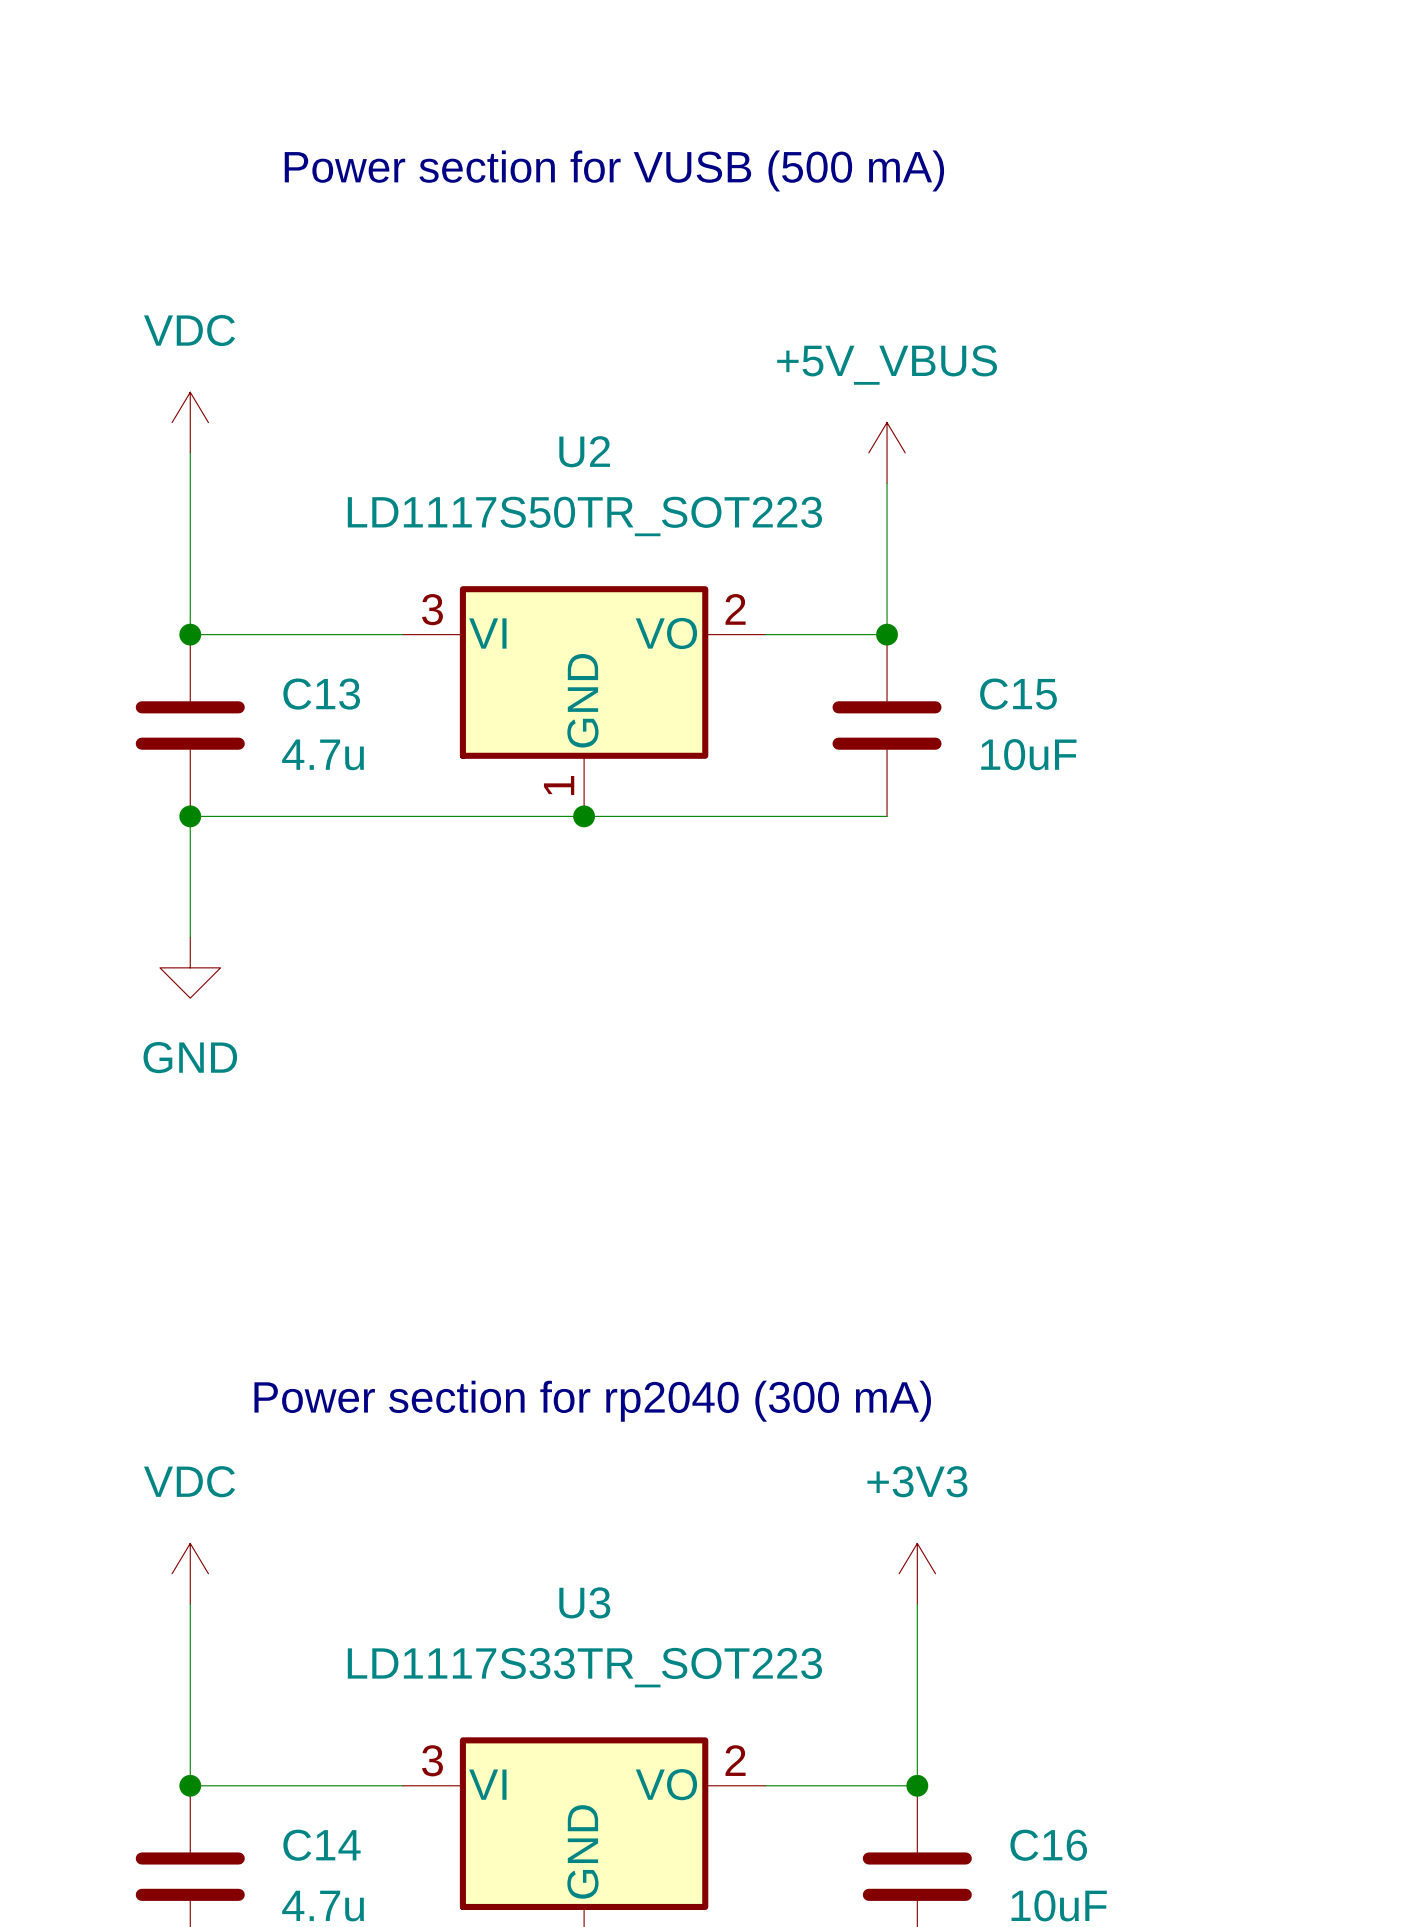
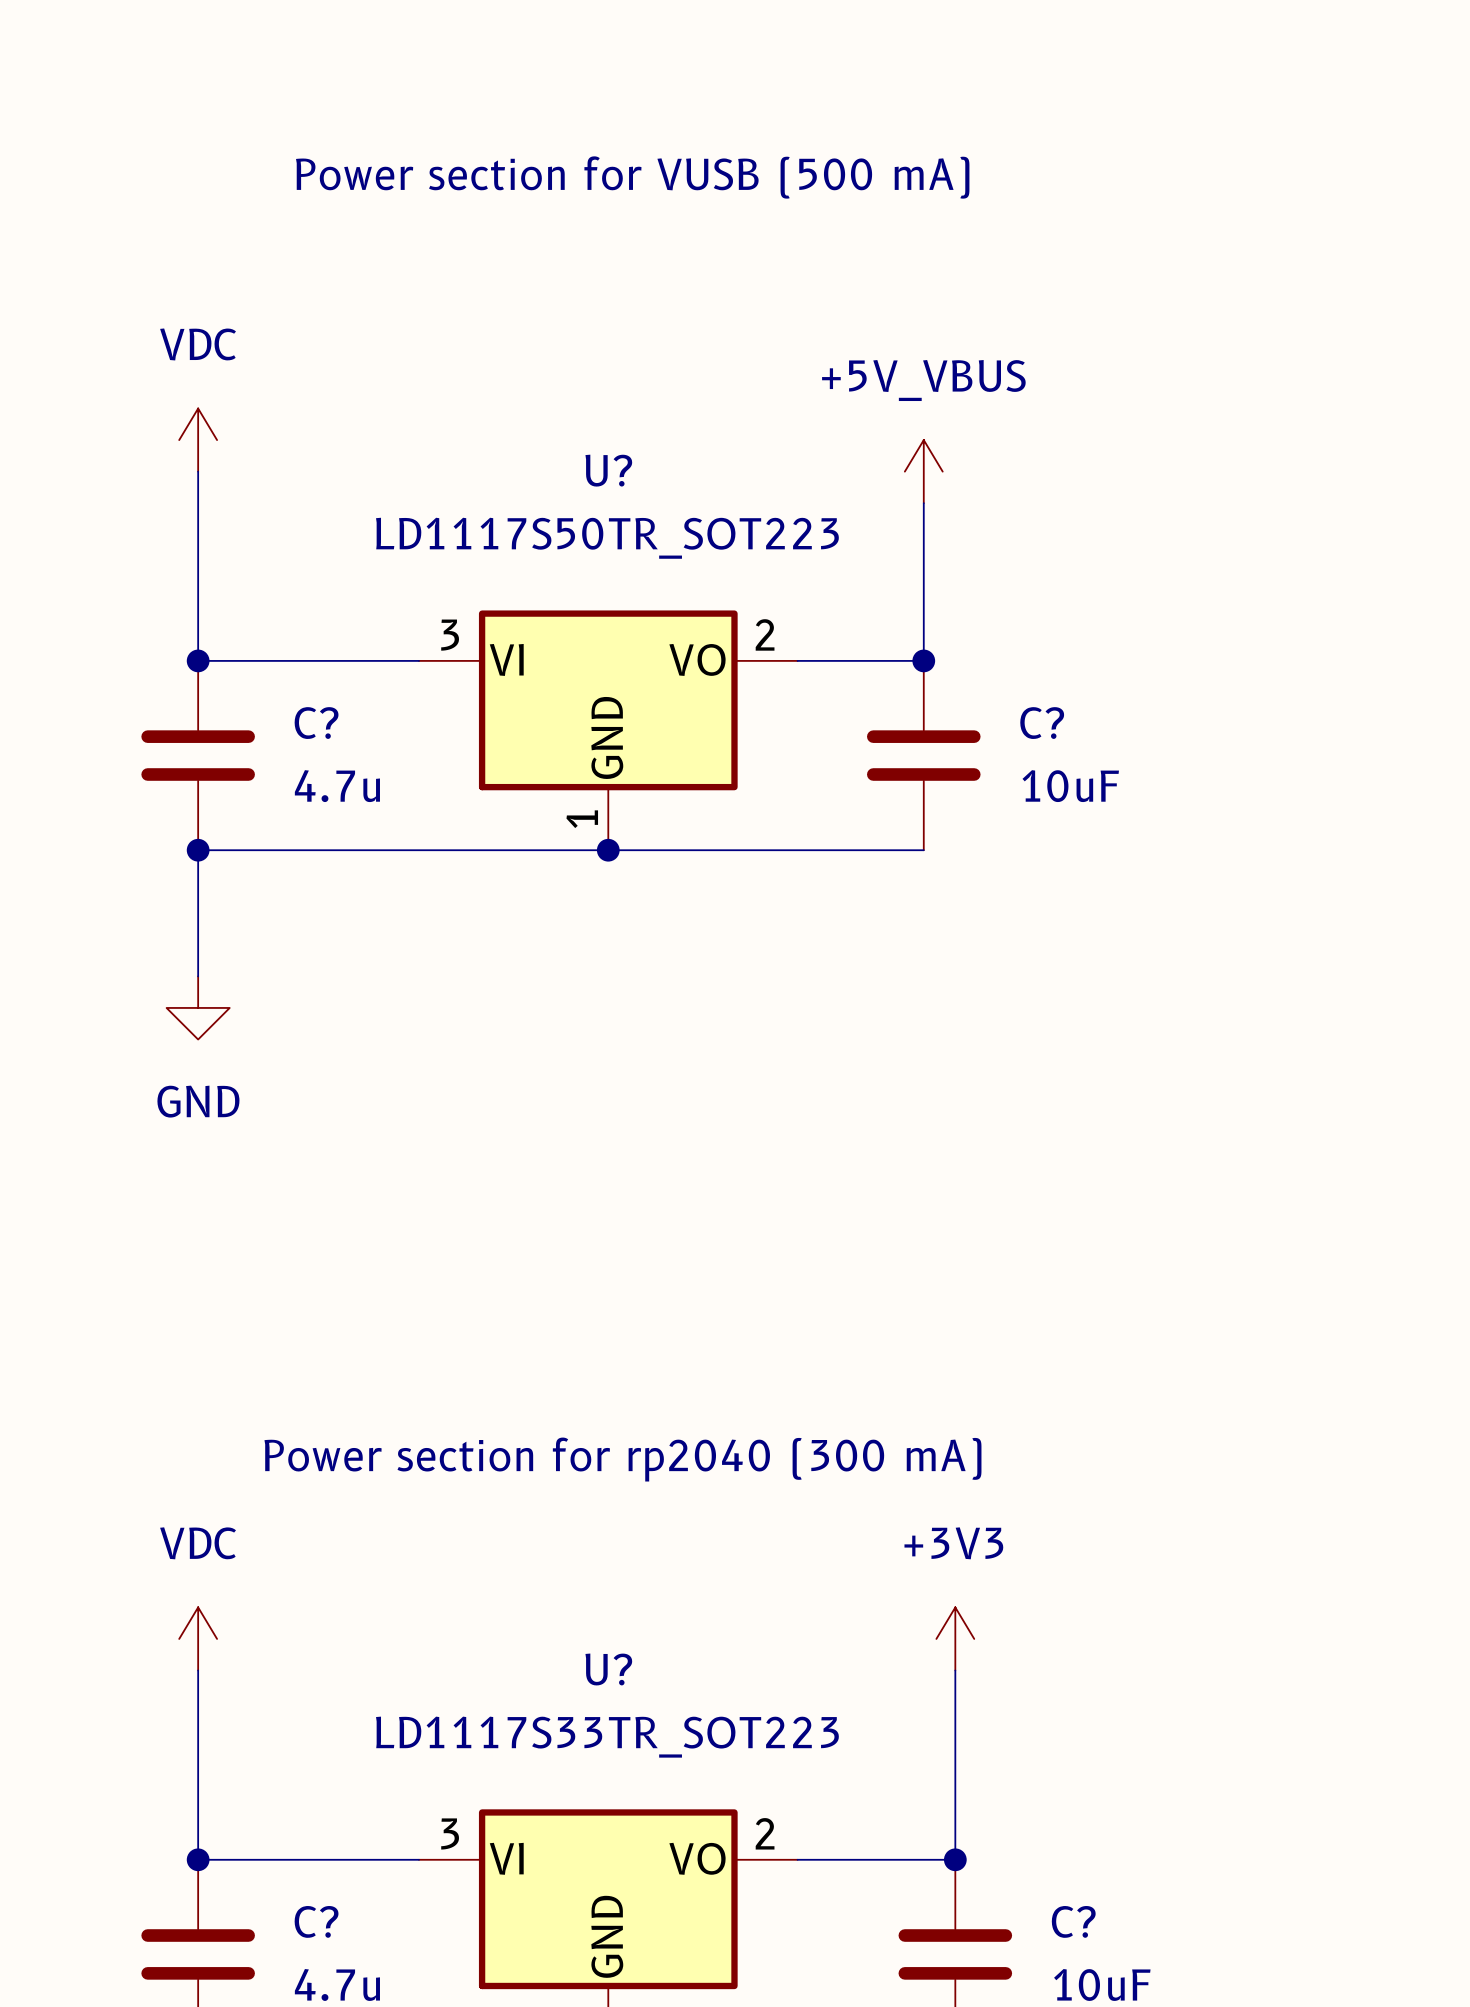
U2 name: U2 (584, 451) -> U? (608, 470)
C13 name: C13 (321, 694) -> C? (316, 723)
C15 name: C15 (1018, 694) -> C? (1042, 723)
U3 name: U3 (584, 1602) -> U? (608, 1669)
C14 name: C14 (322, 1845) -> C? (316, 1921)
C16 name: C16 (1048, 1845) -> C? (1073, 1921)

